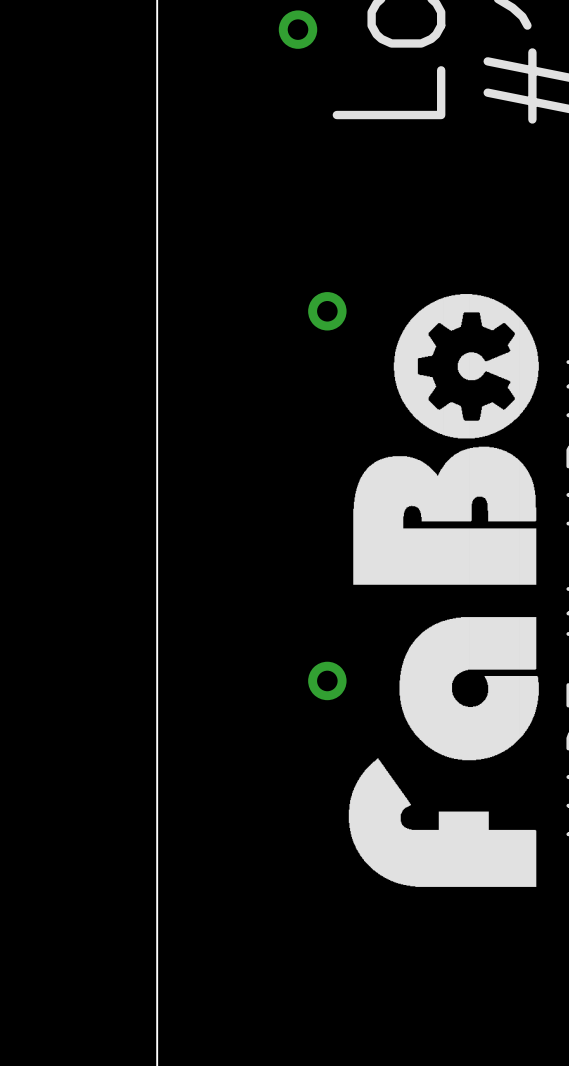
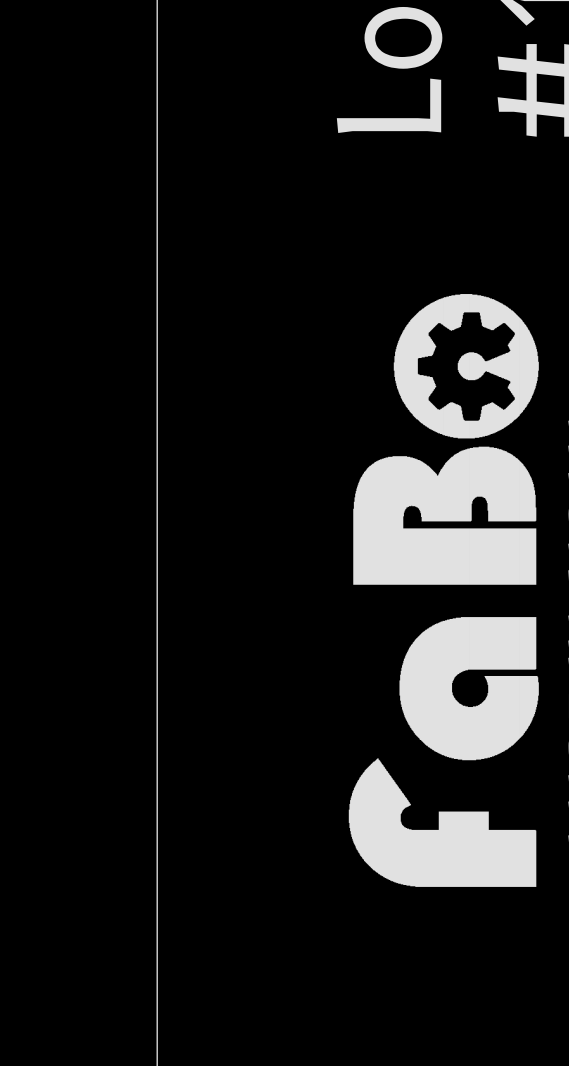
via: (298, 29) -> none
via: (327, 311) -> none
via: (327, 680) -> none

